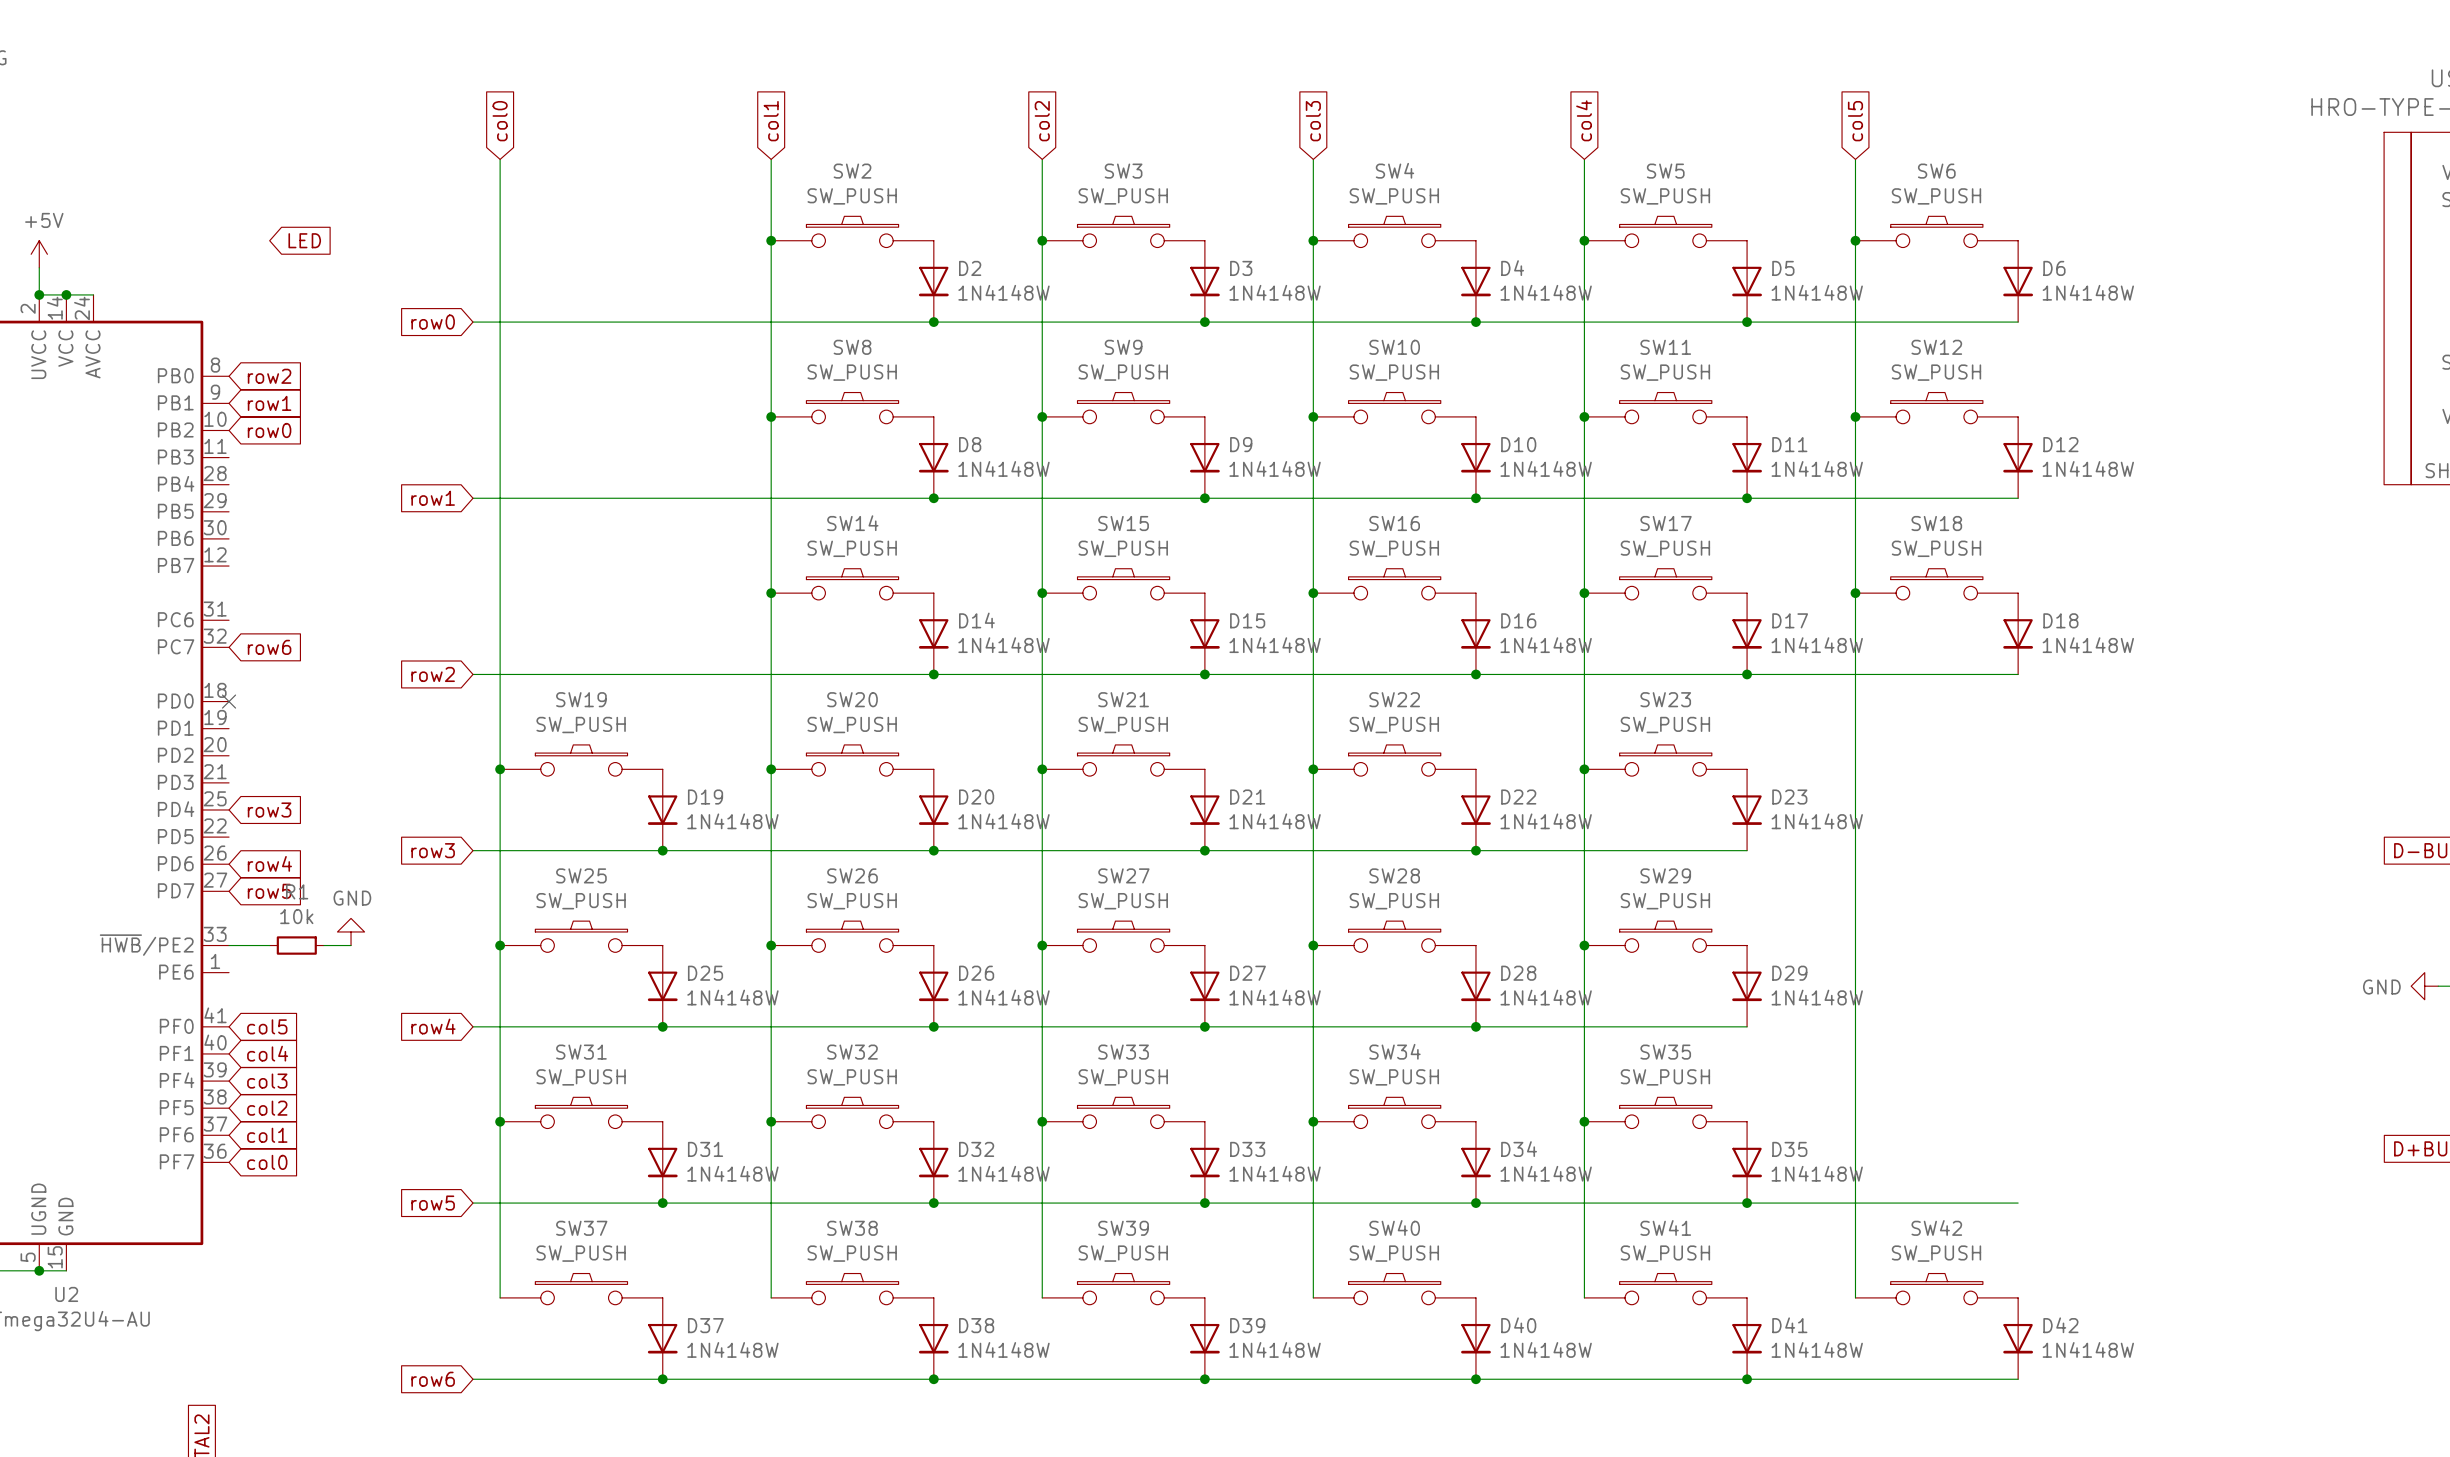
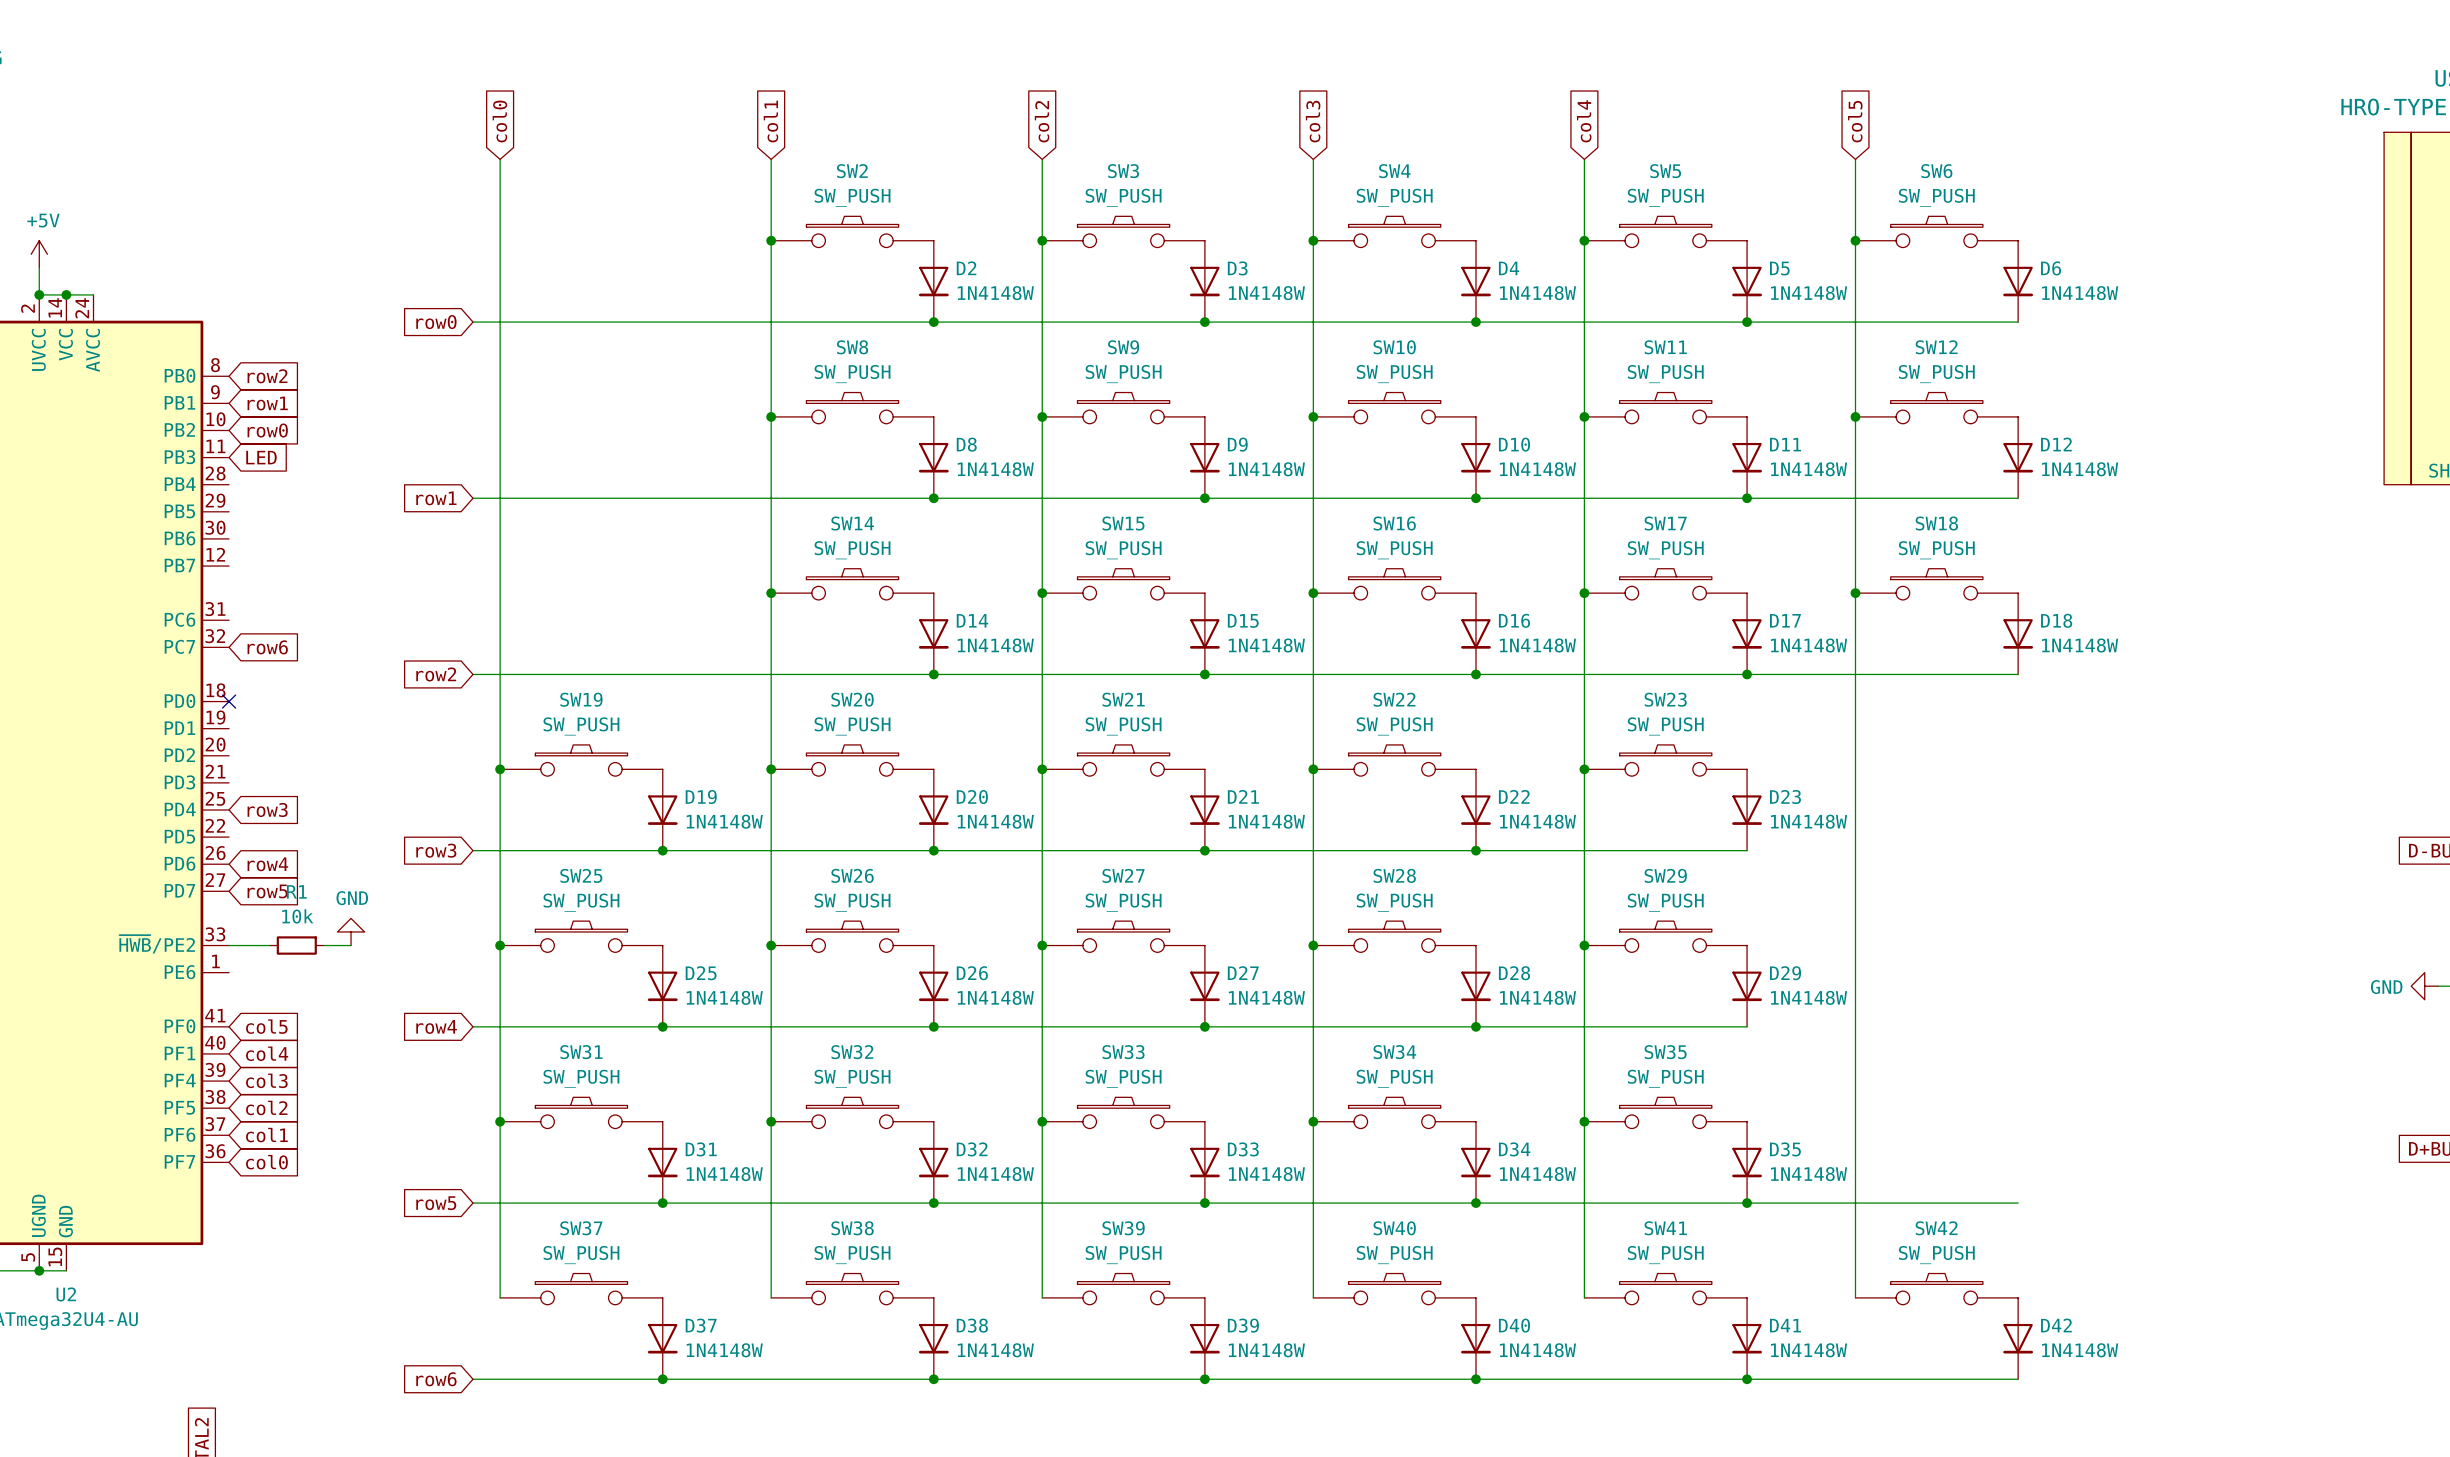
global label position: LED (304, 240) -> LED (261, 457)

